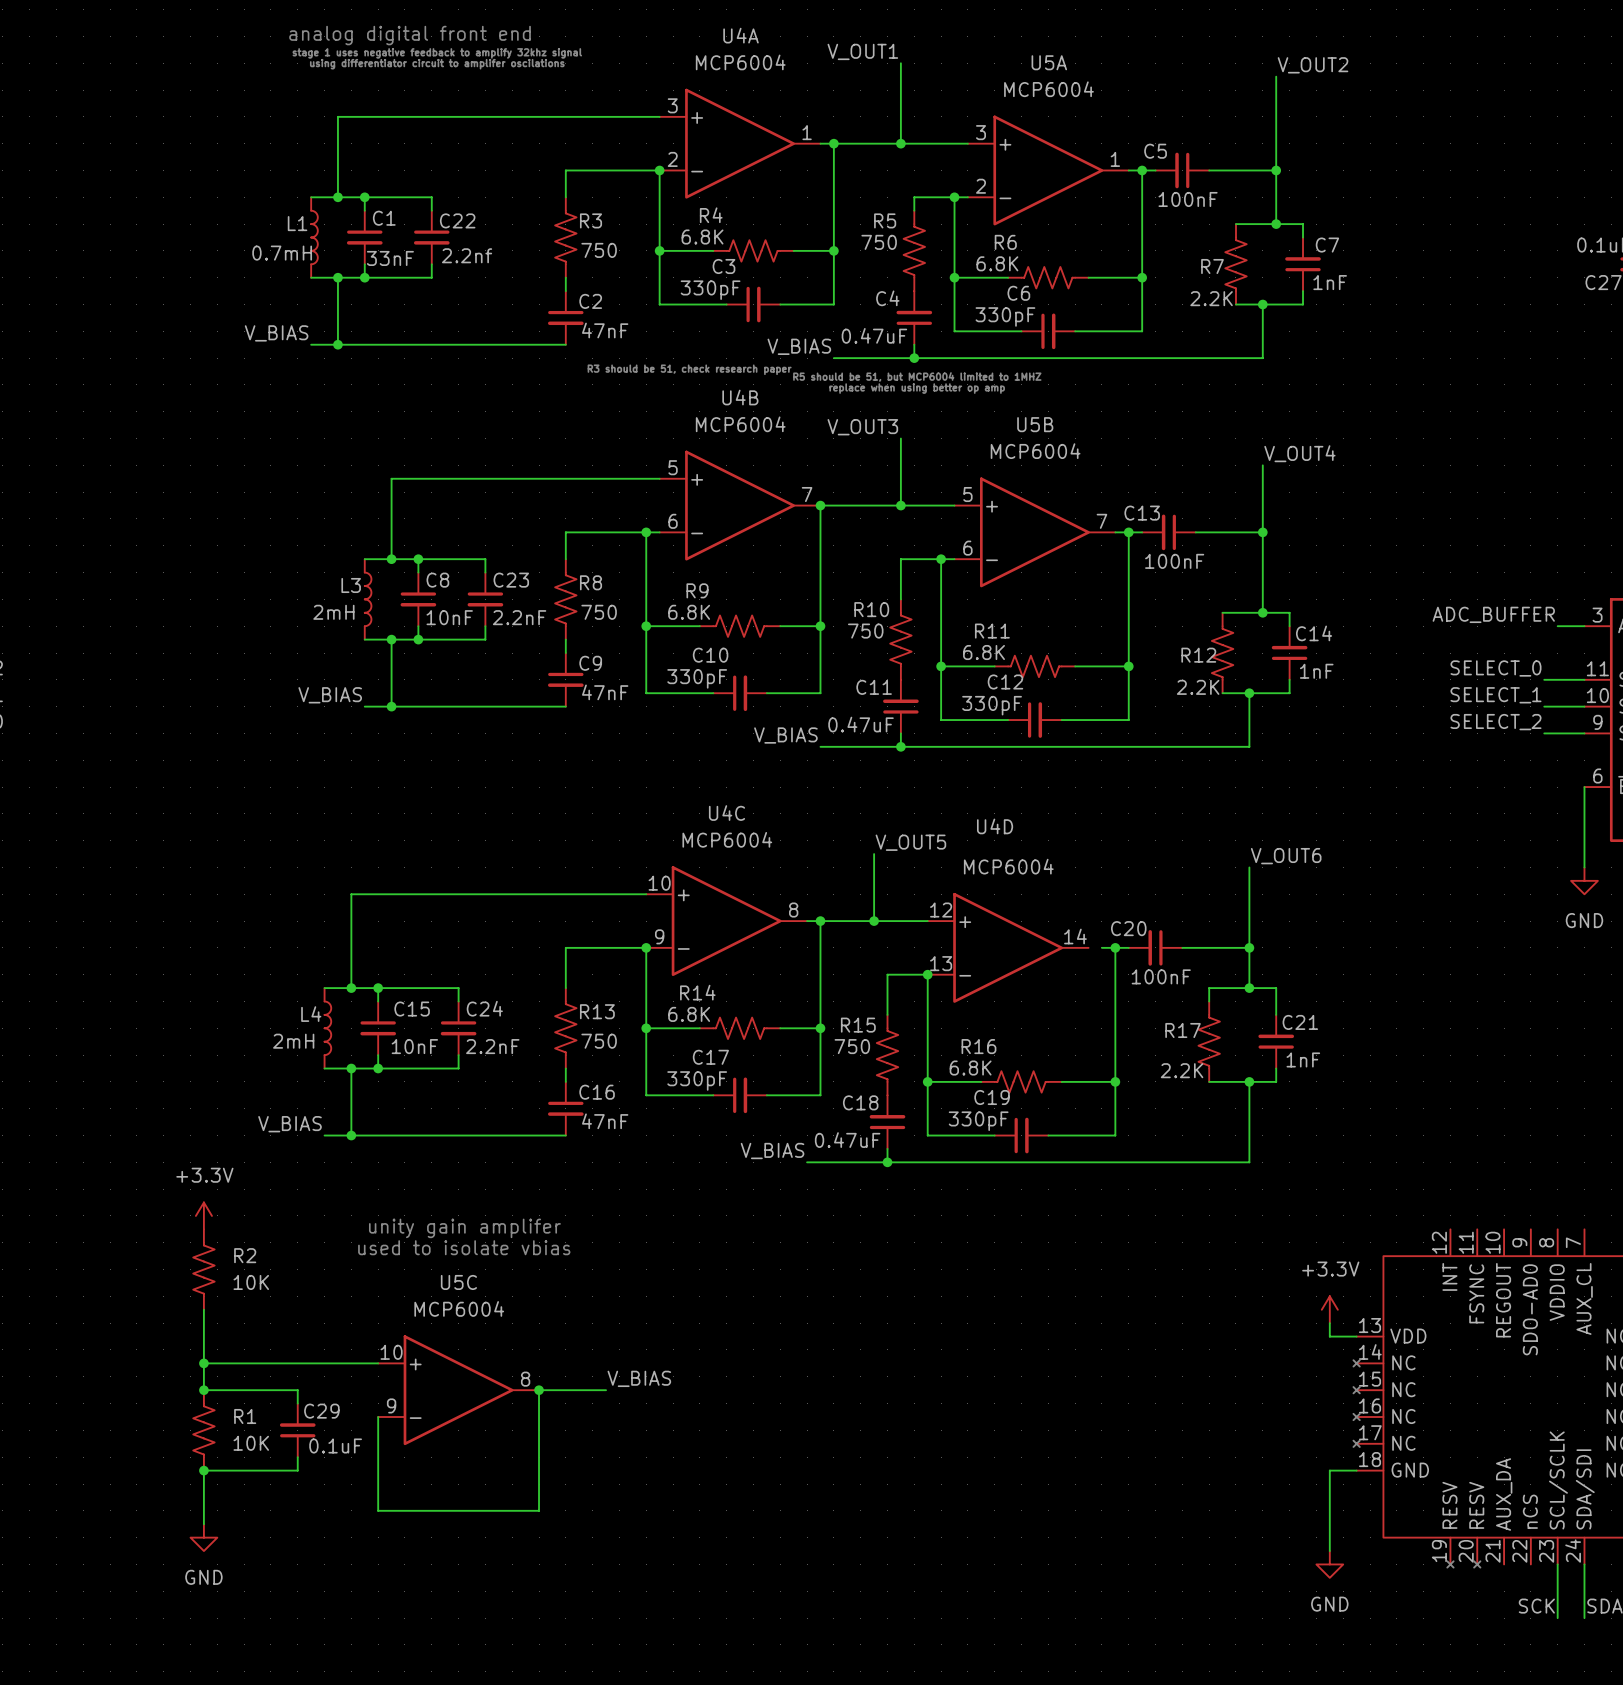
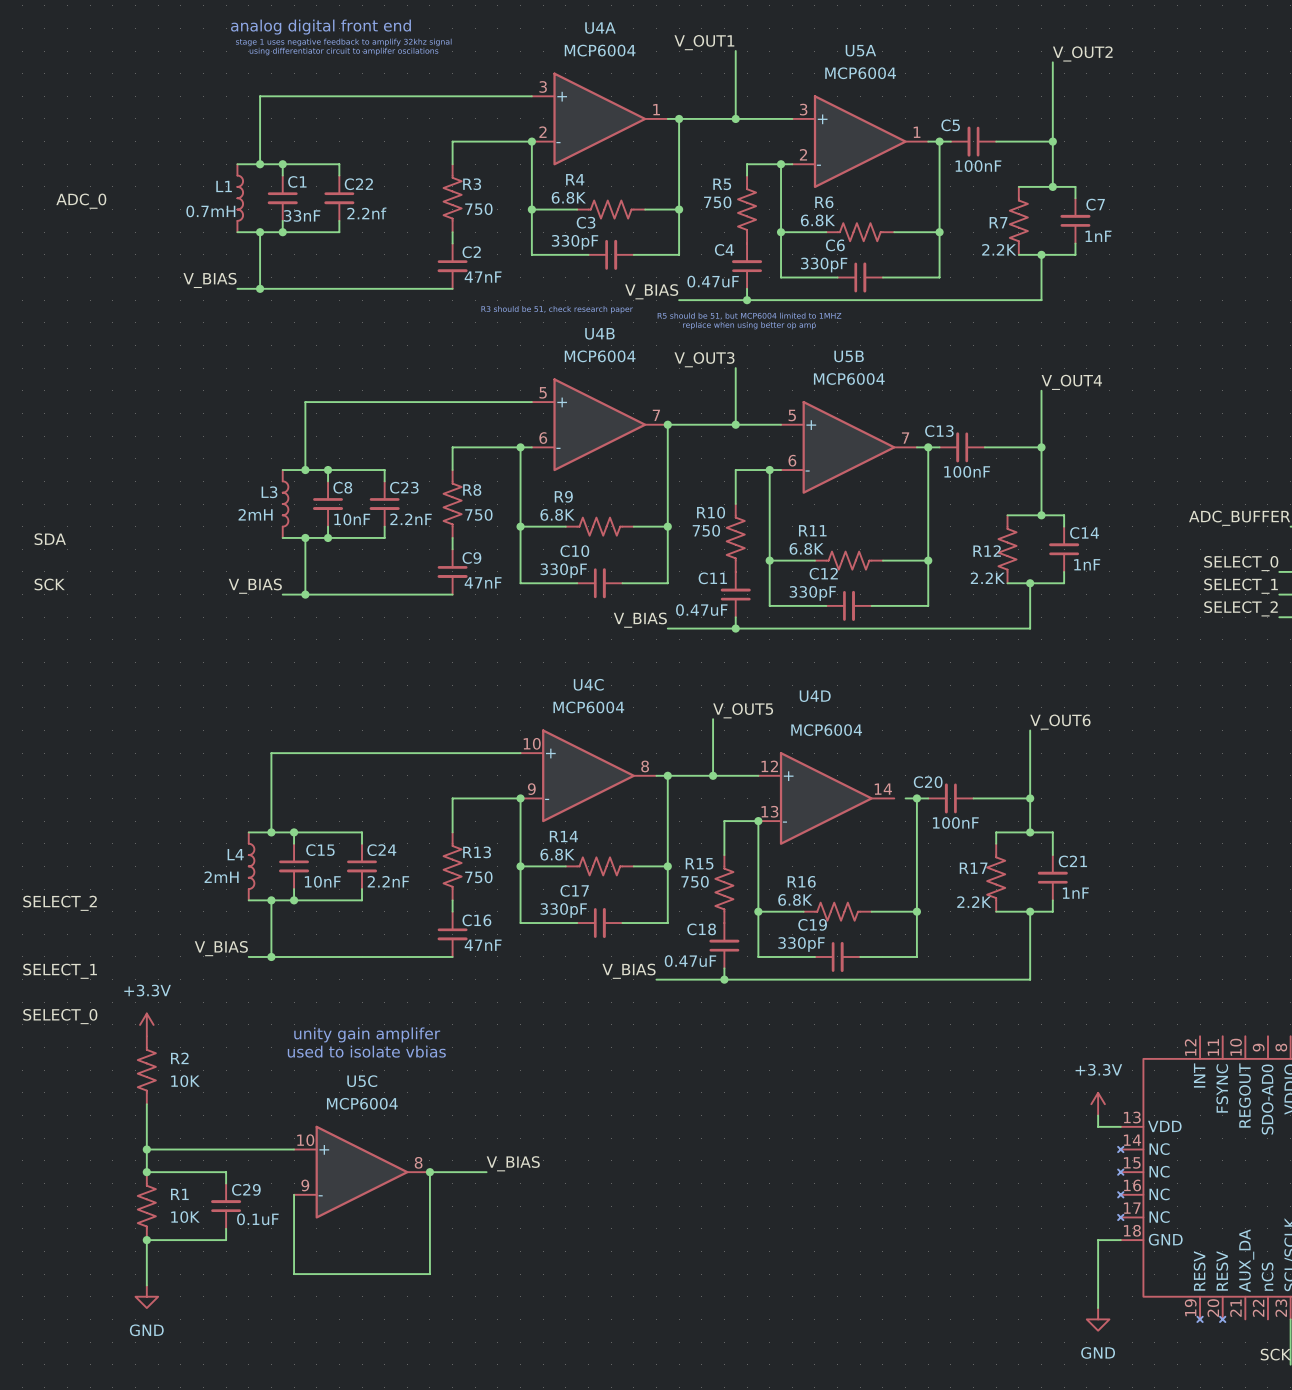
label: none -> ADC_0 (81, 201)
label: none -> SDA (50, 539)
label: none -> SCK (49, 584)
label: none -> SELECT_2 (60, 903)
label: none -> SELECT_1 (60, 971)
label: none -> SELECT_0 (60, 1016)

